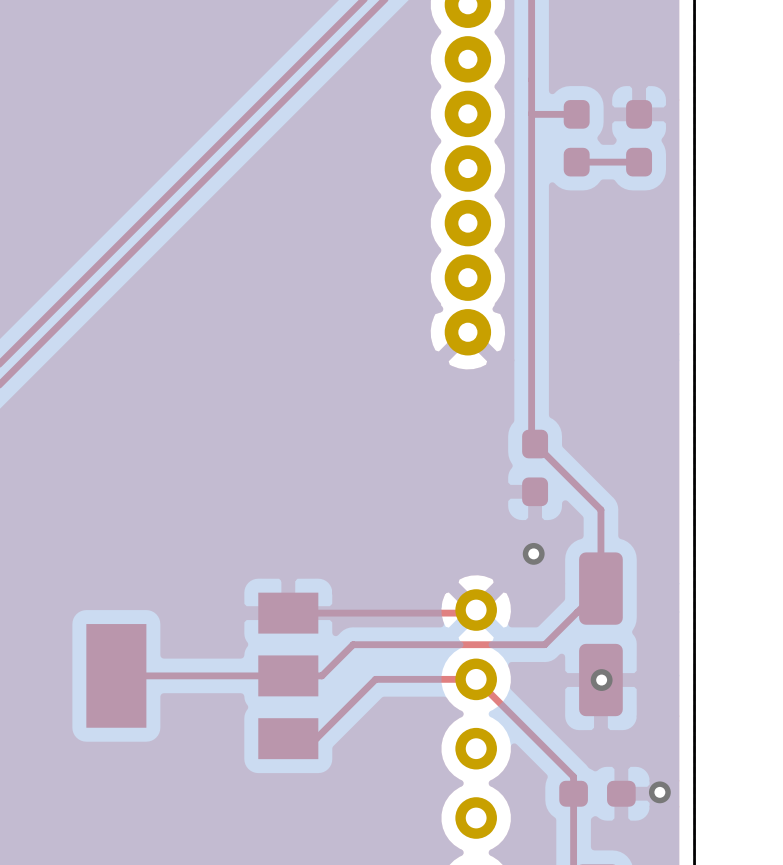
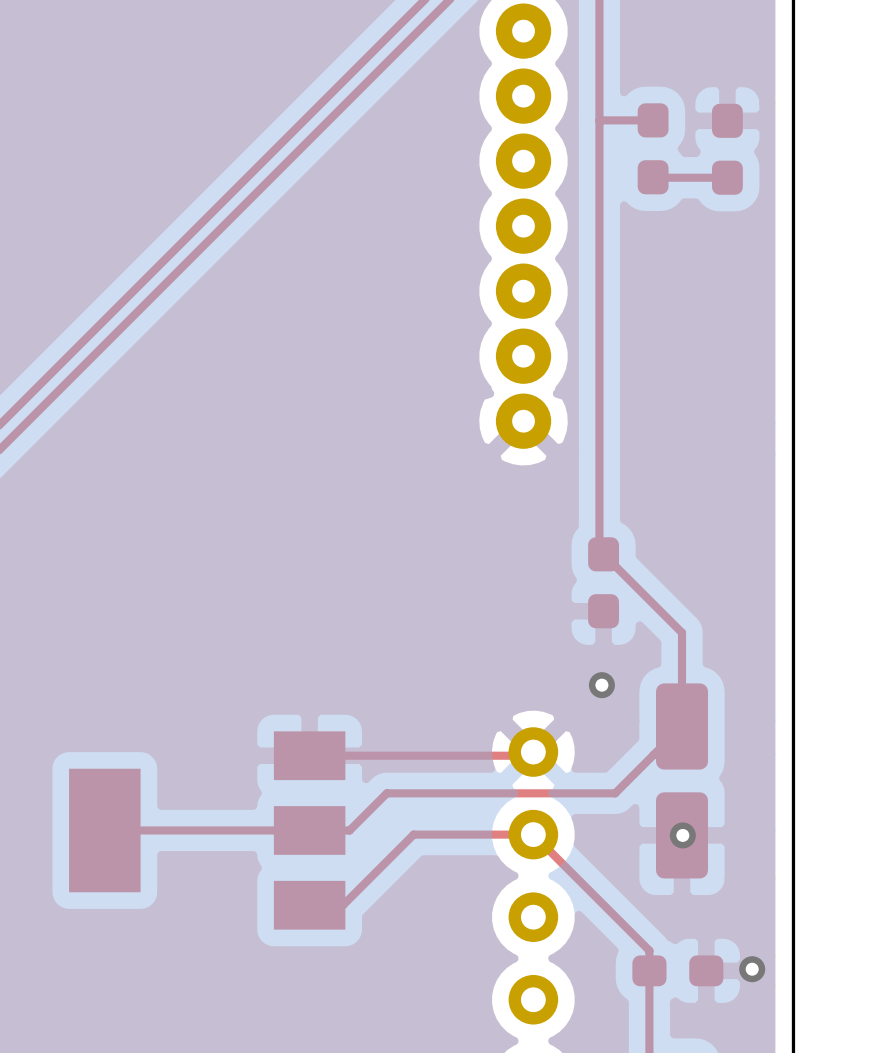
top track: none -> (653, 120) (599, 120)
top track: (531, 113) (576, 114) -> none
part position: (576, 138) -> (653, 148)
part position: (639, 138) -> (727, 149)
top track: (639, 162) (576, 162) -> (727, 177) (653, 177)

